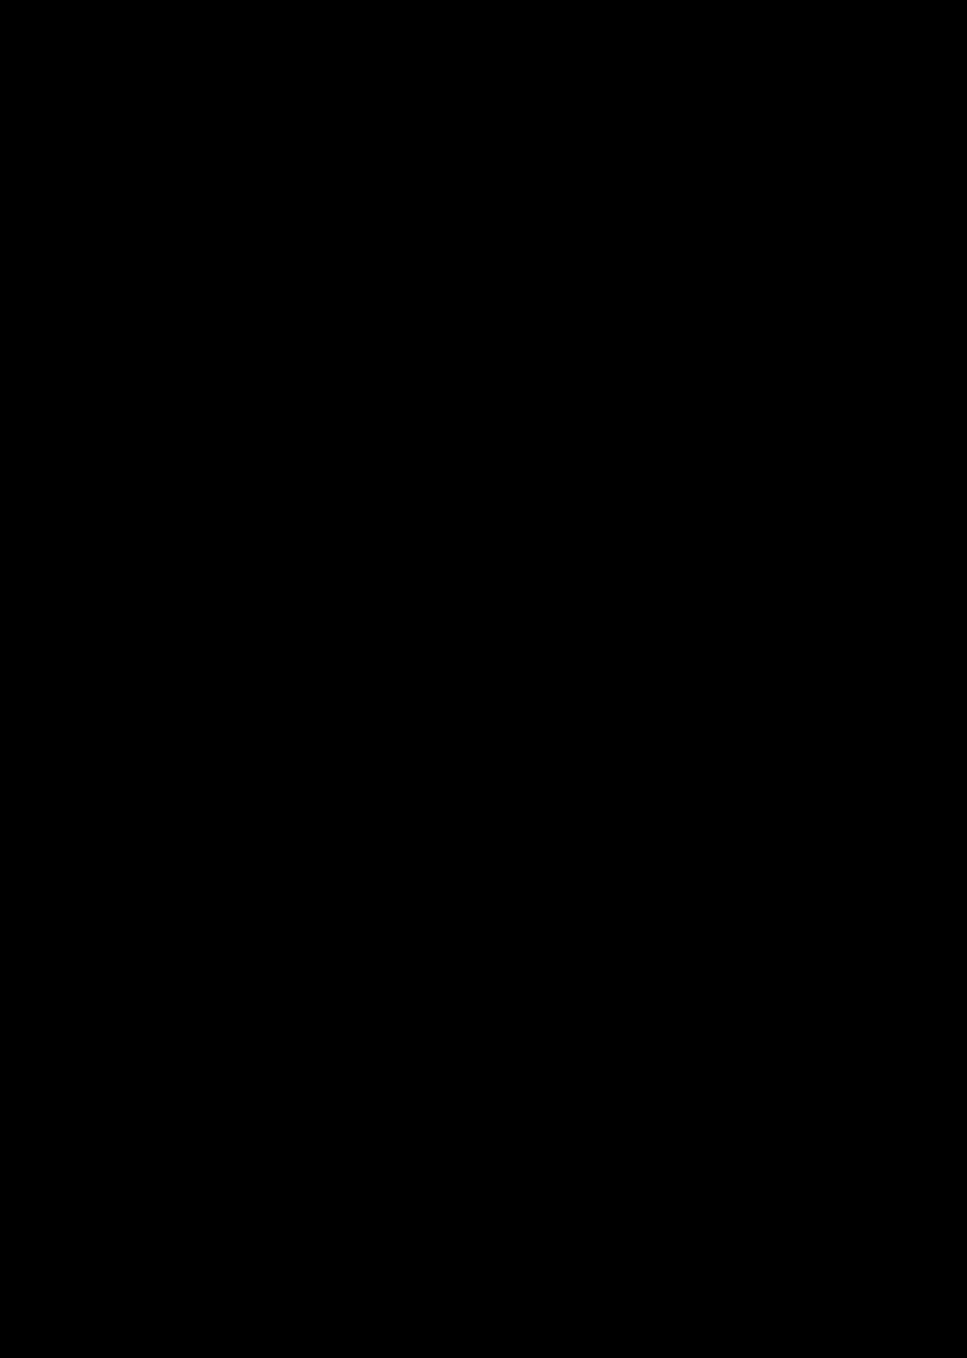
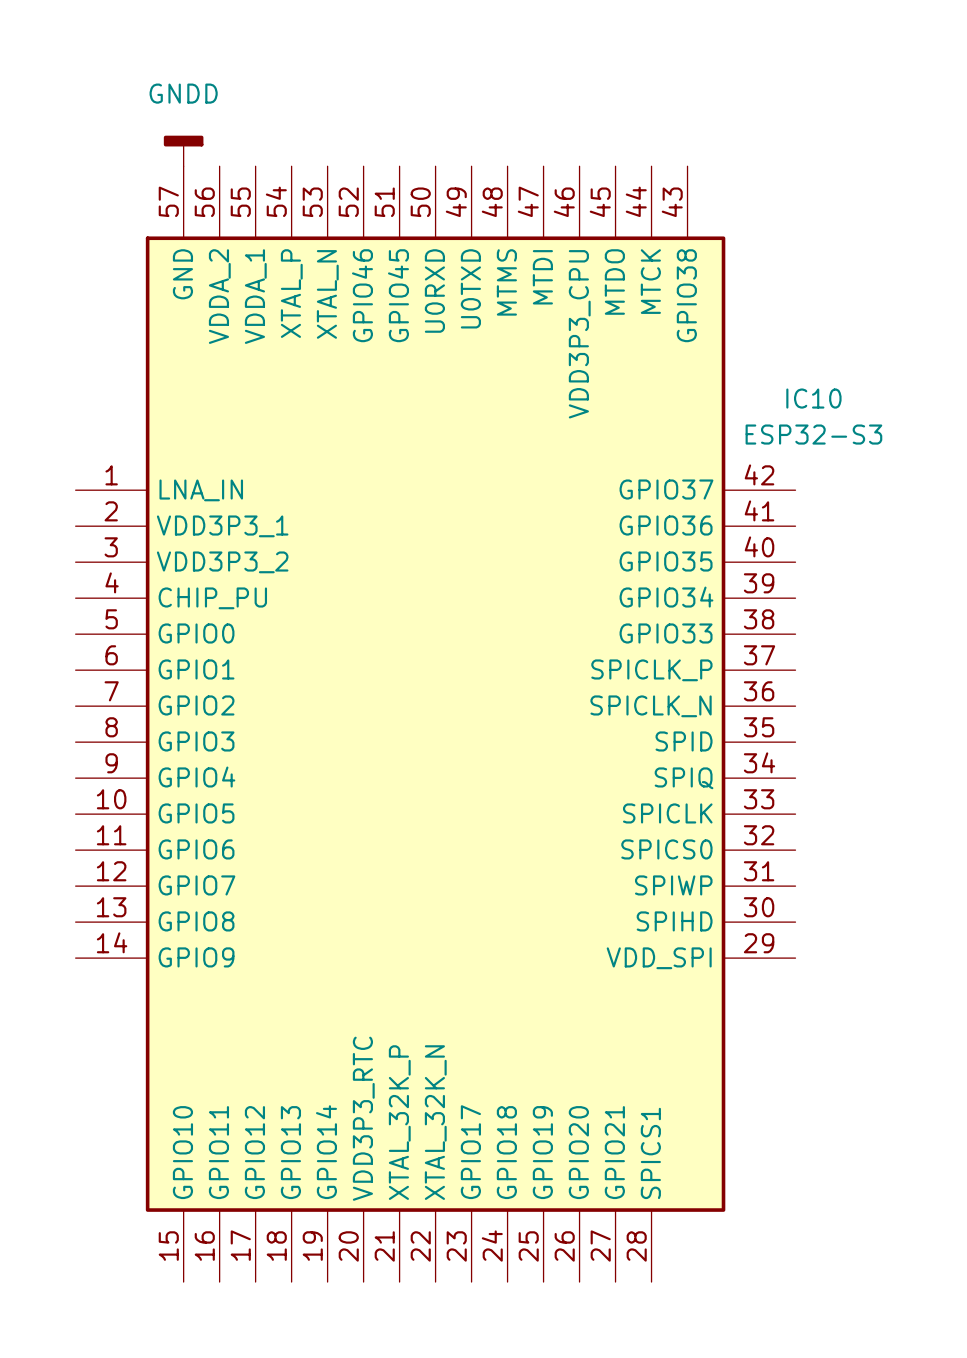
power symbol: none -> GNDD (183, 150)
IC10: none -> ESP32-S3 (435, 724)

